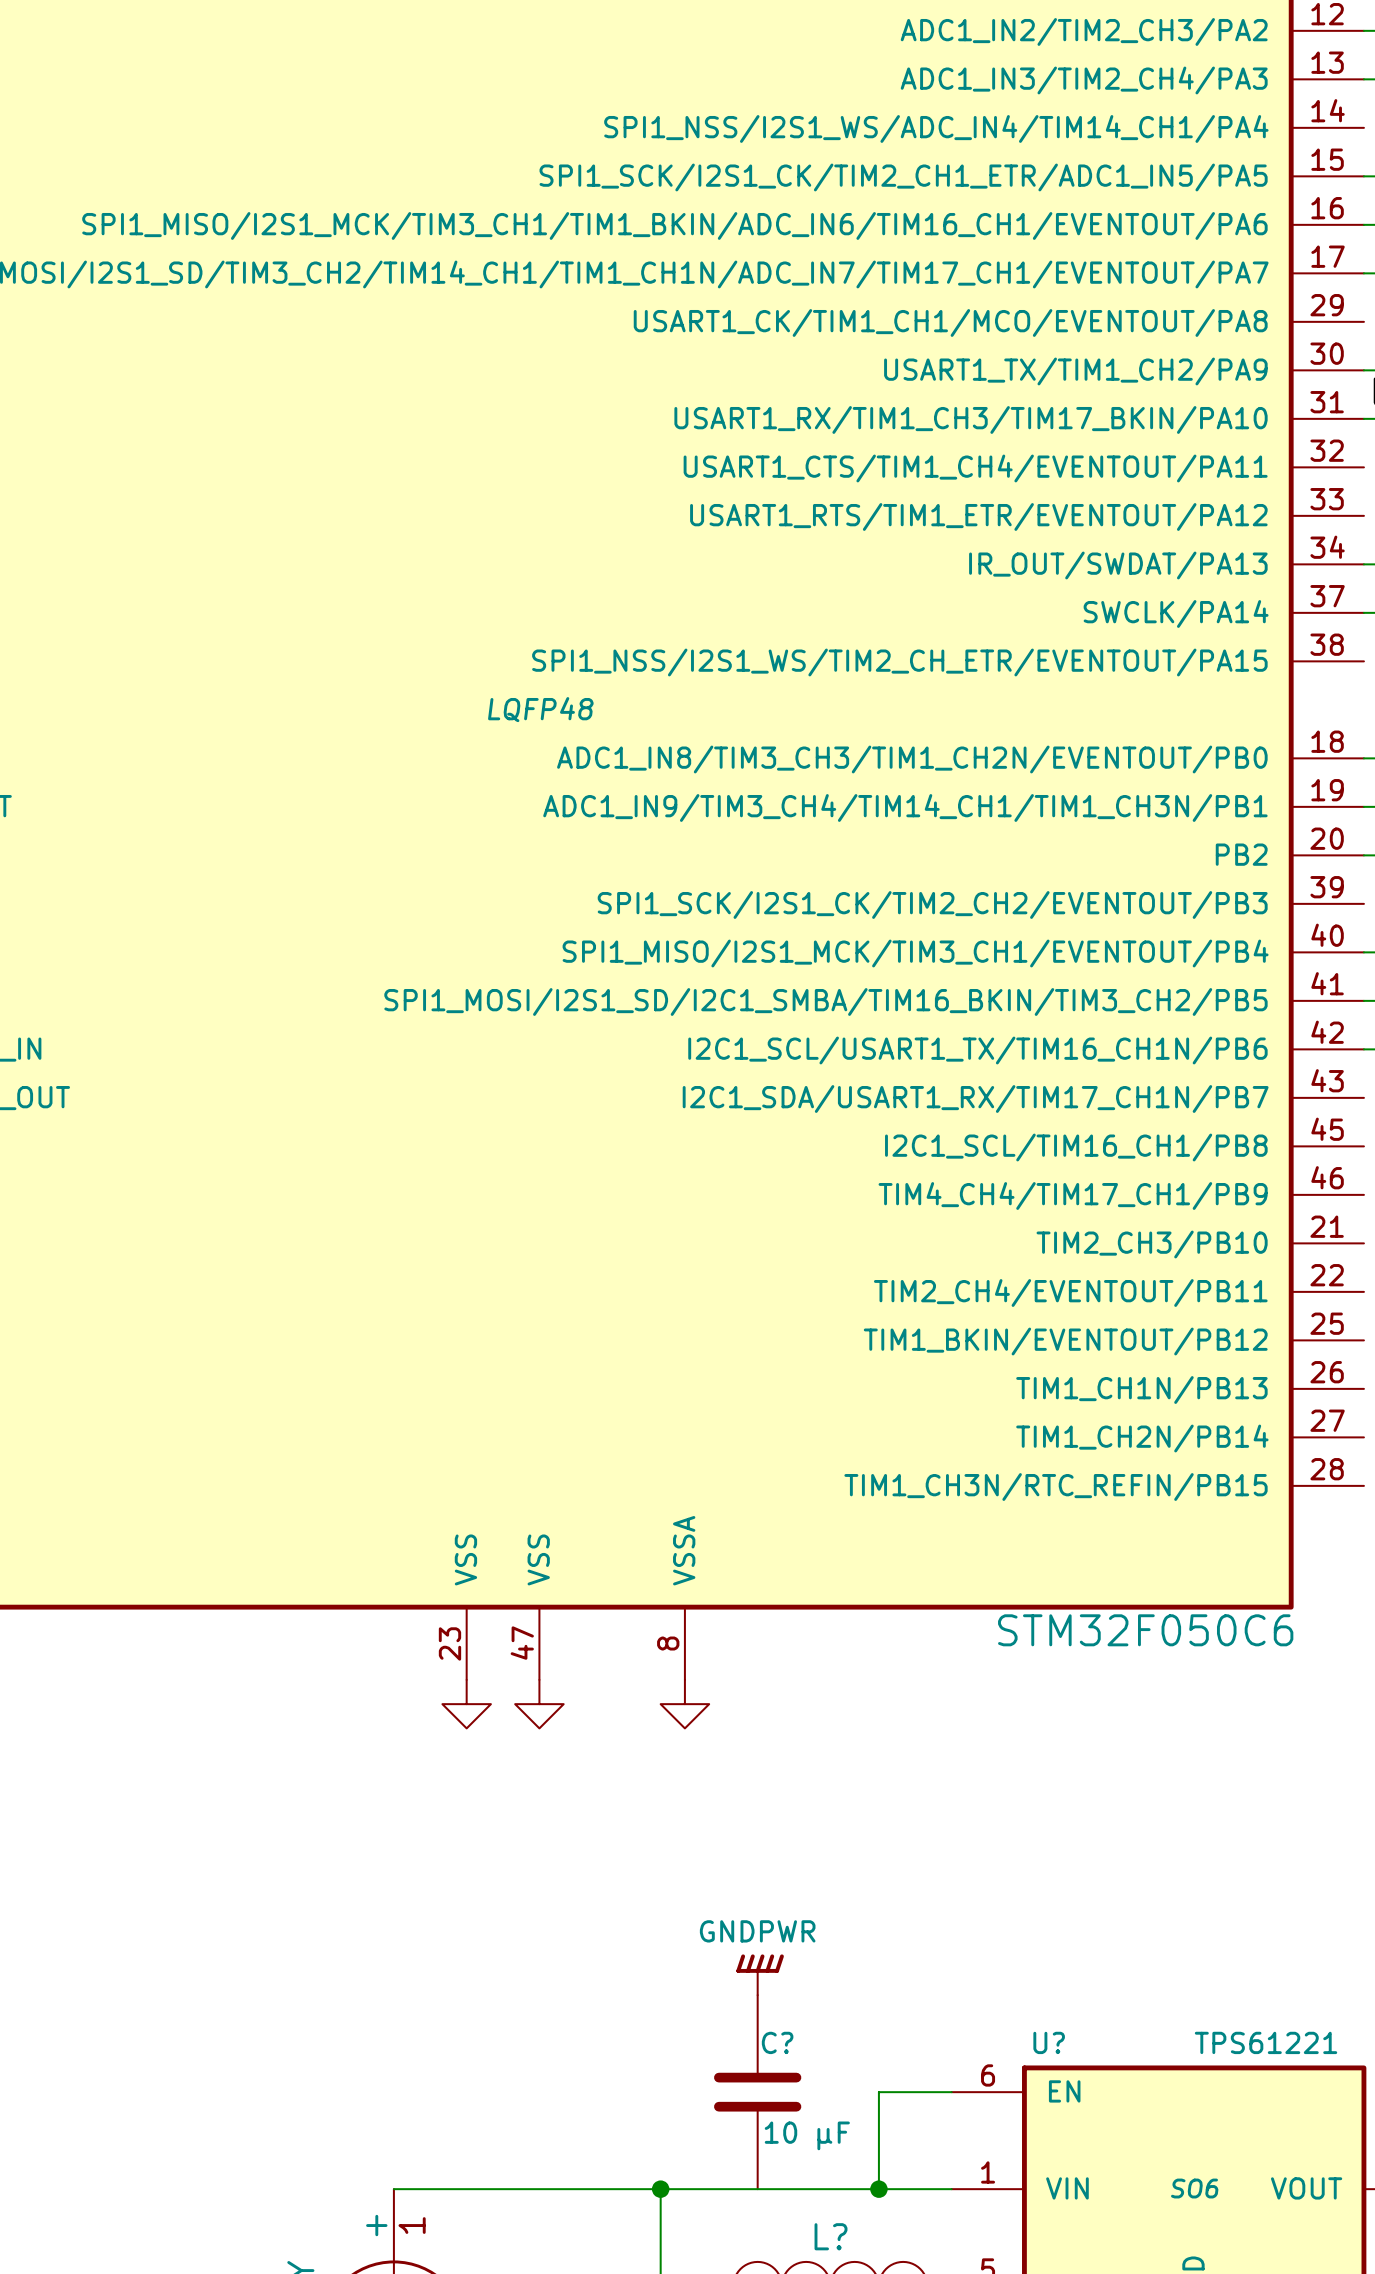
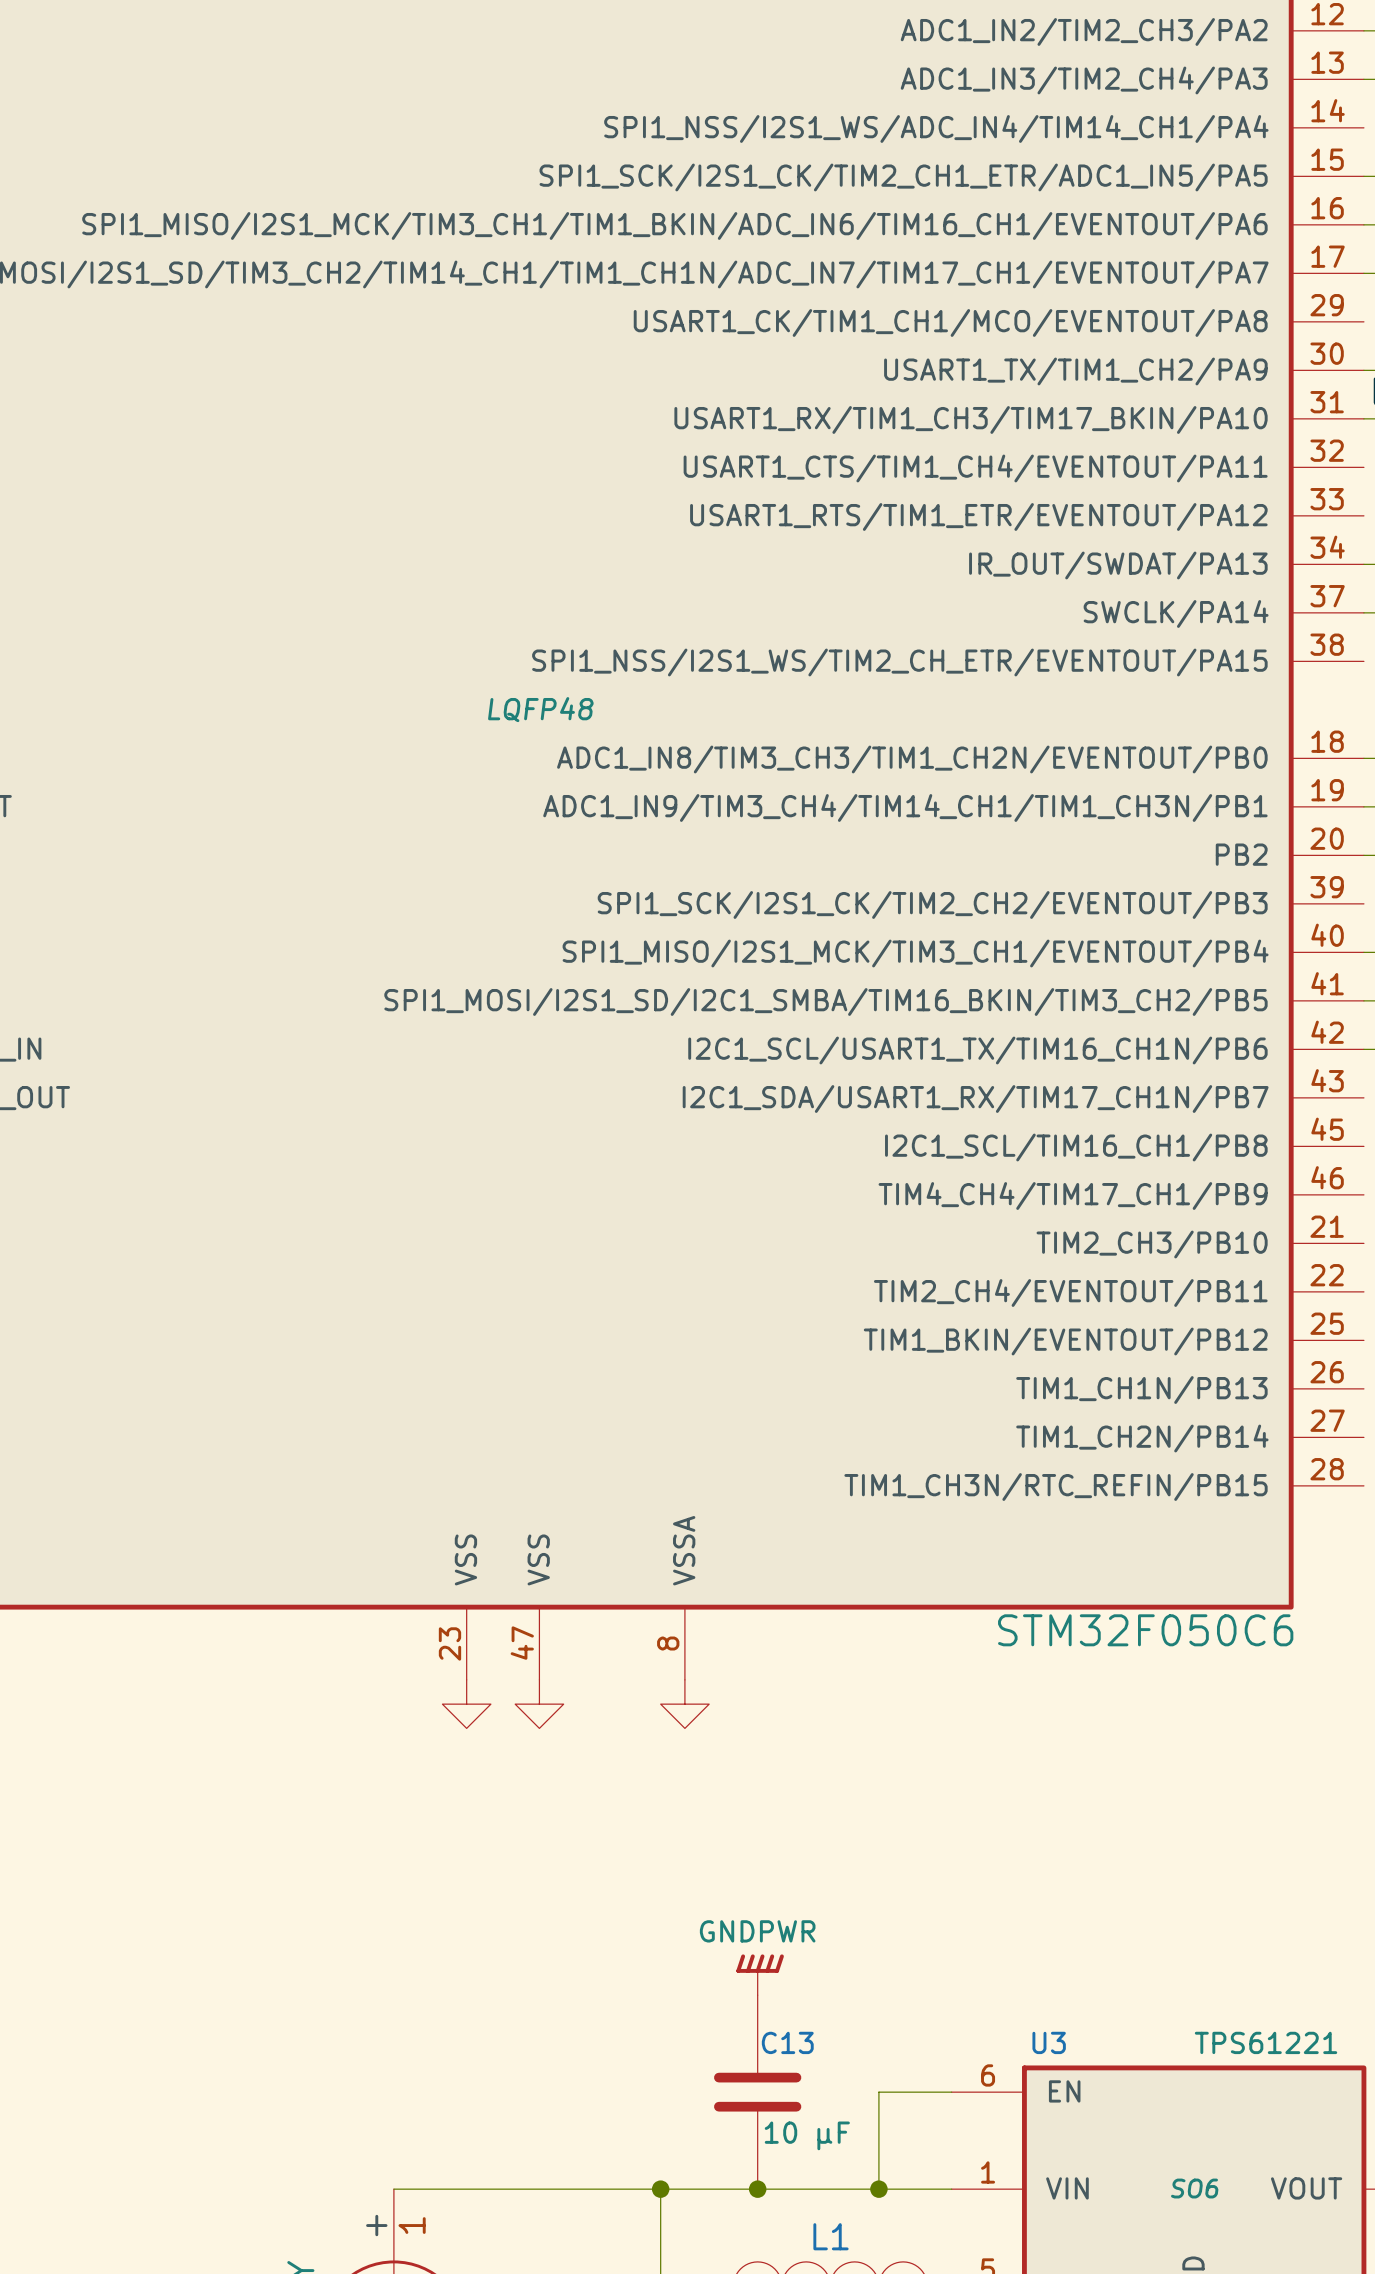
C? name: C? (777, 2042) -> C13 (787, 2042)
U? name: U? (1049, 2042) -> U3 (1049, 2042)
junction: none -> (757, 2189)
L? name: L? (831, 2236) -> L1 (831, 2236)

